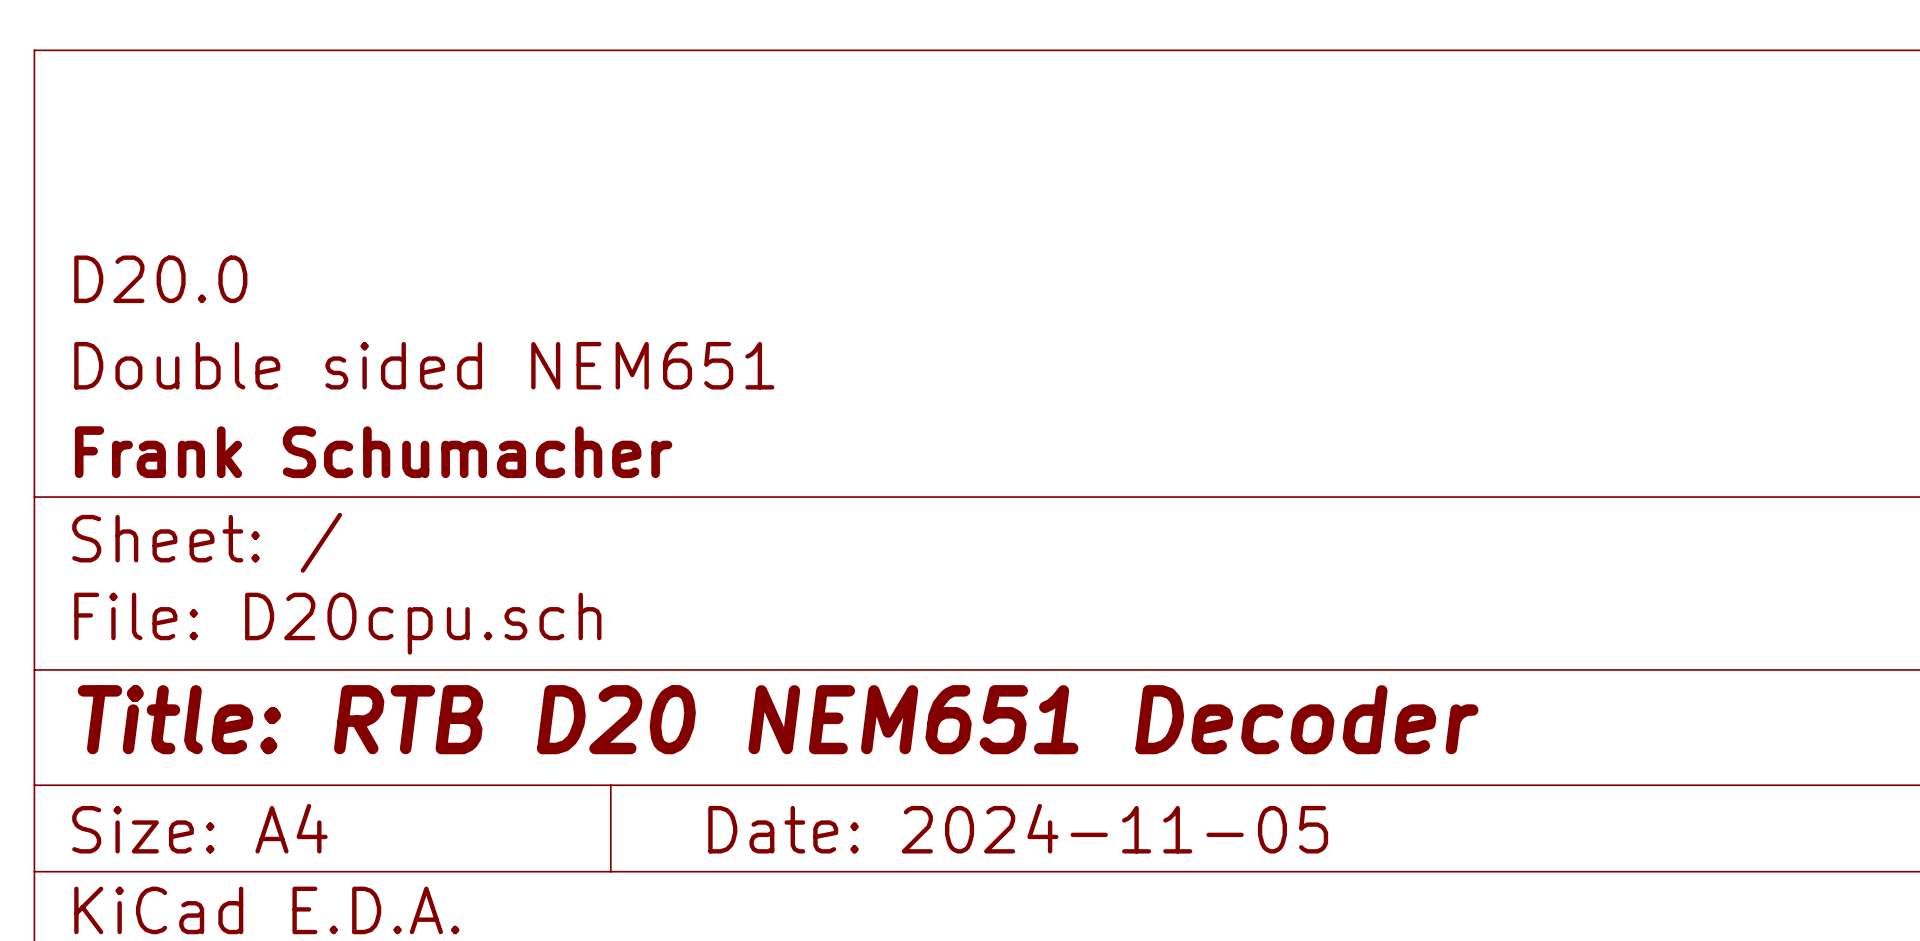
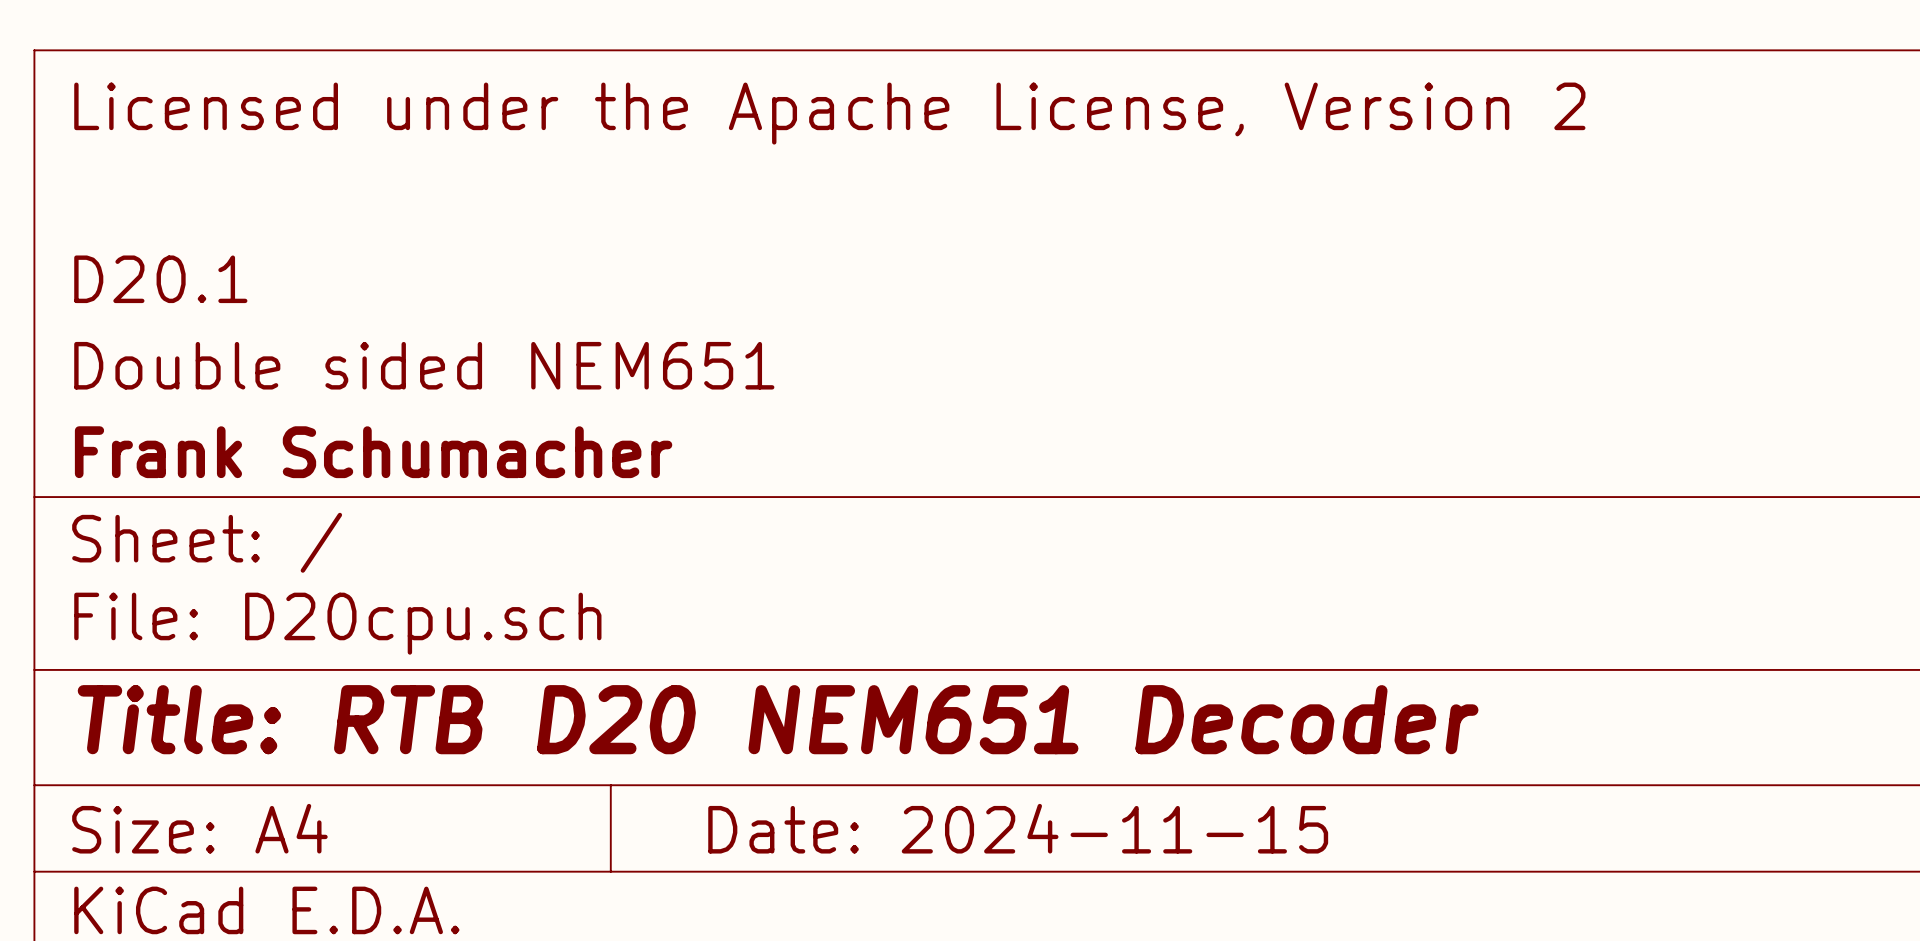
title block: none -> Licensed under the Apache License, Version 2 (829, 113)
title block: D20.0 (160, 279) -> D20.1 (160, 279)
title block: Date: 2024-11-05 (1018, 828) -> Date: 2024-11-15 (1018, 828)

